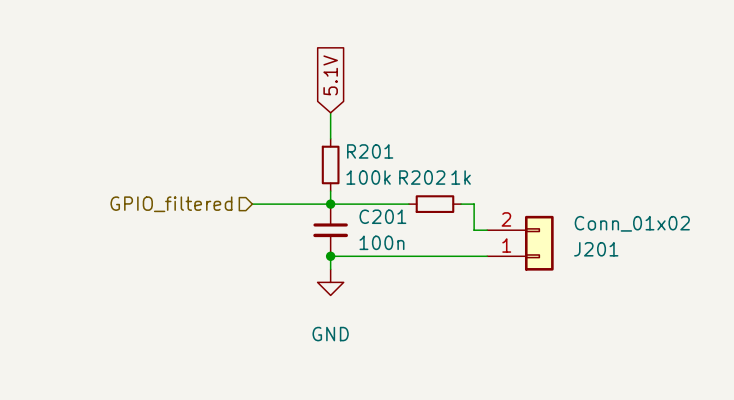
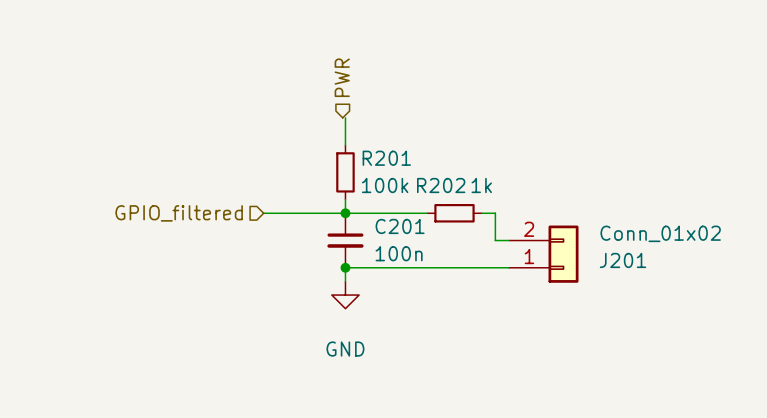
hierarchical label: none -> PWR (342, 77)
global label: 5.1V (330, 75) -> none

